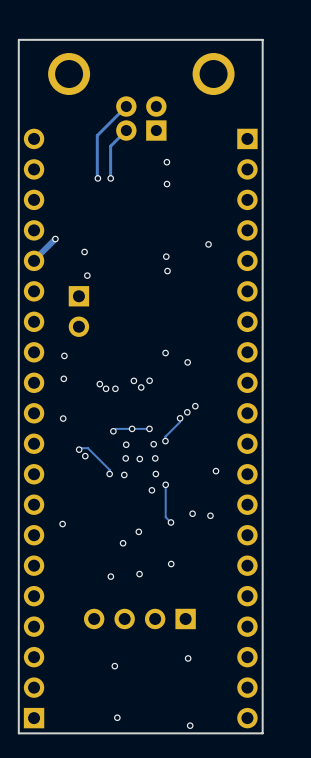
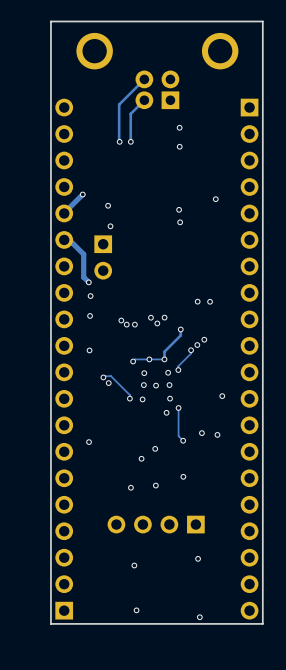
track: none -> (64, 239) (69, 239) (83, 254) (83, 277) (88, 282)
via: none -> (88, 282)
via: (165, 353) -> none
via: none -> (210, 301)
track: none -> (180, 329) (180, 335) (164, 351) (164, 359)
via: none -> (180, 329)

